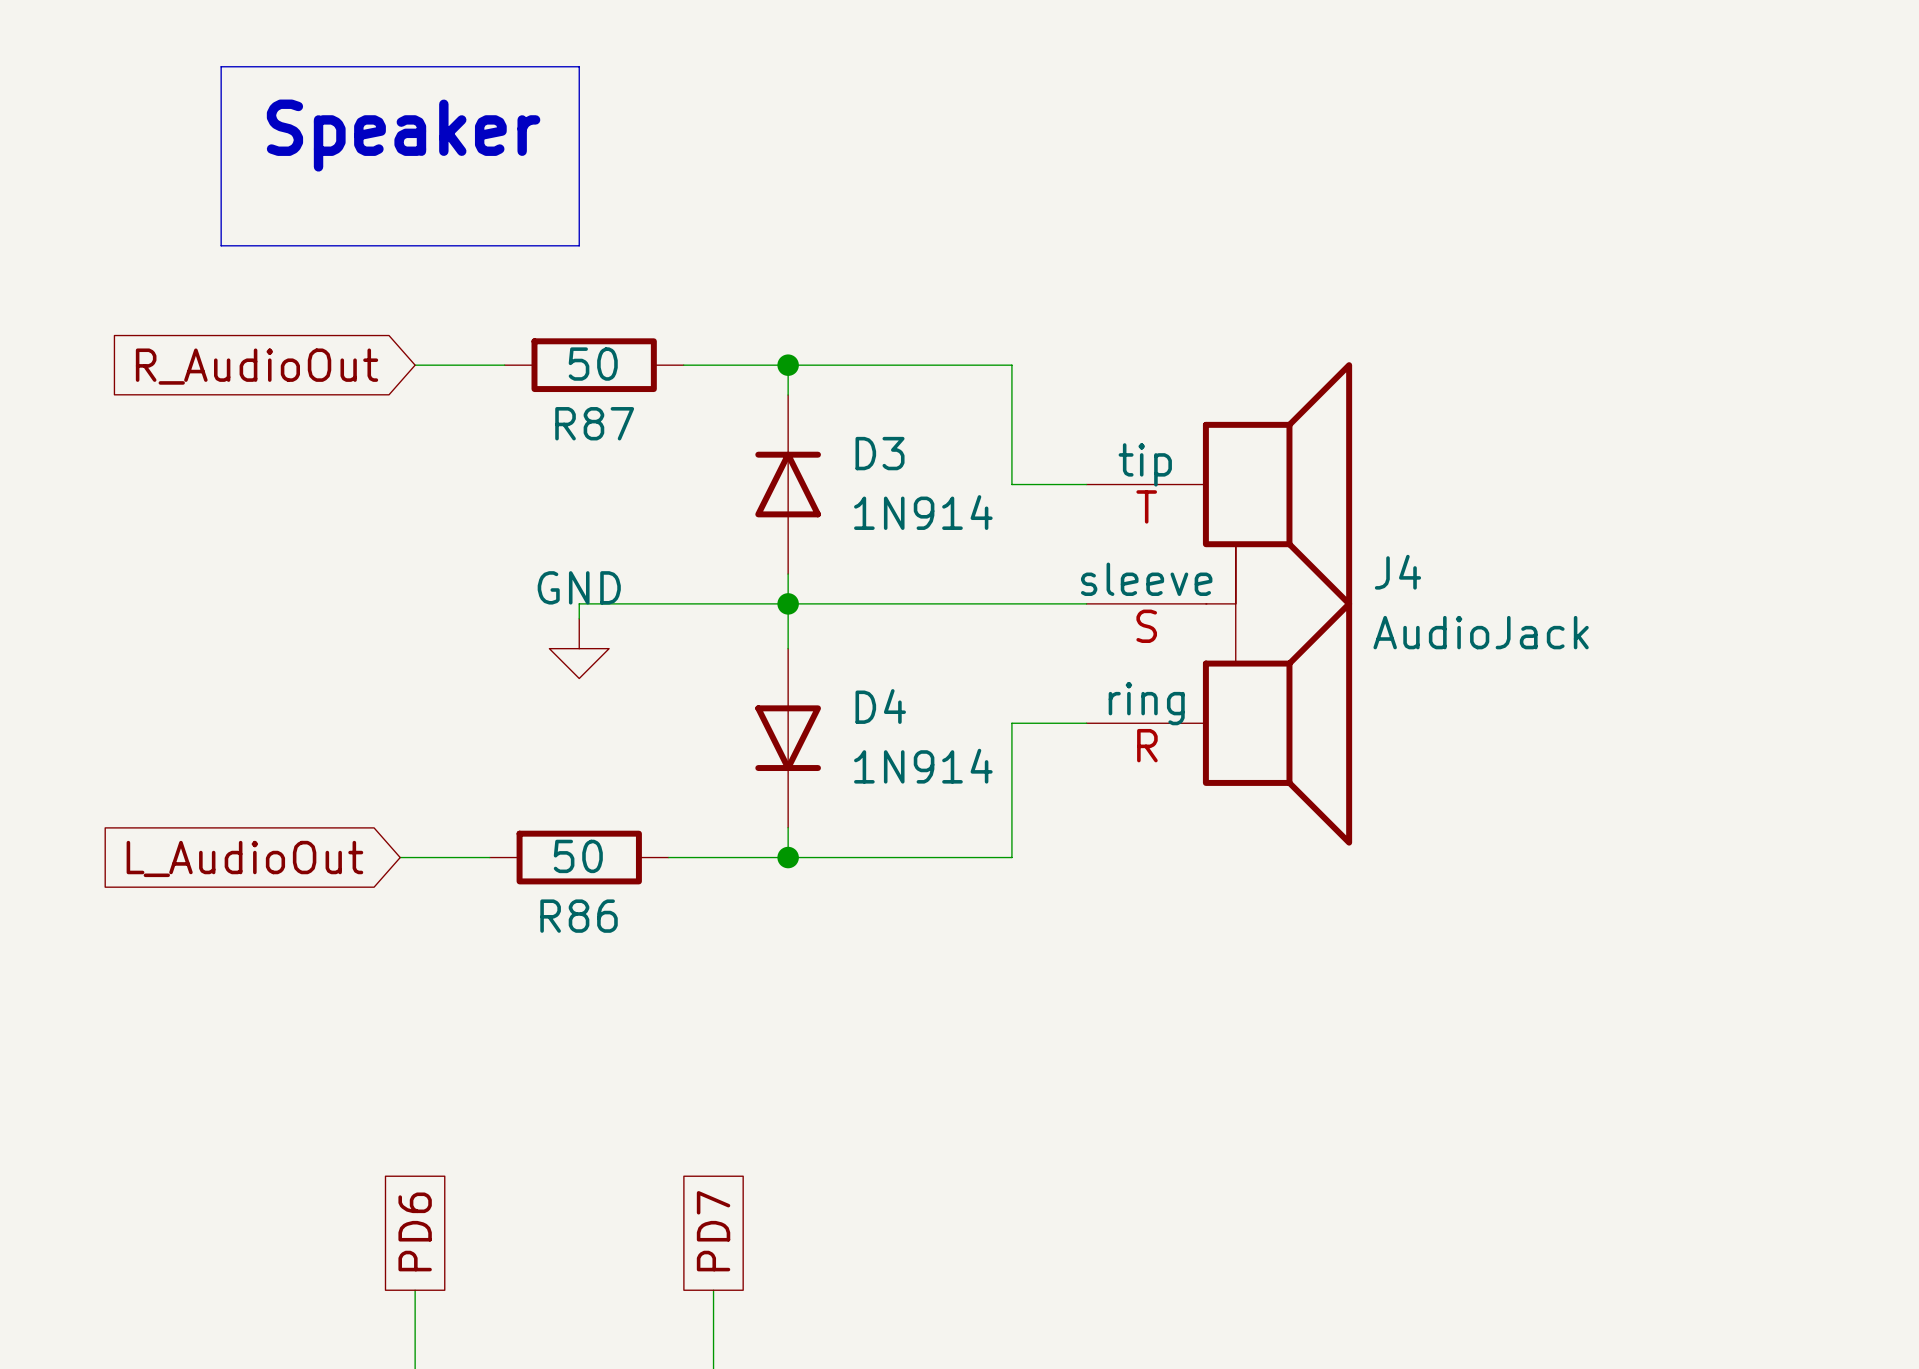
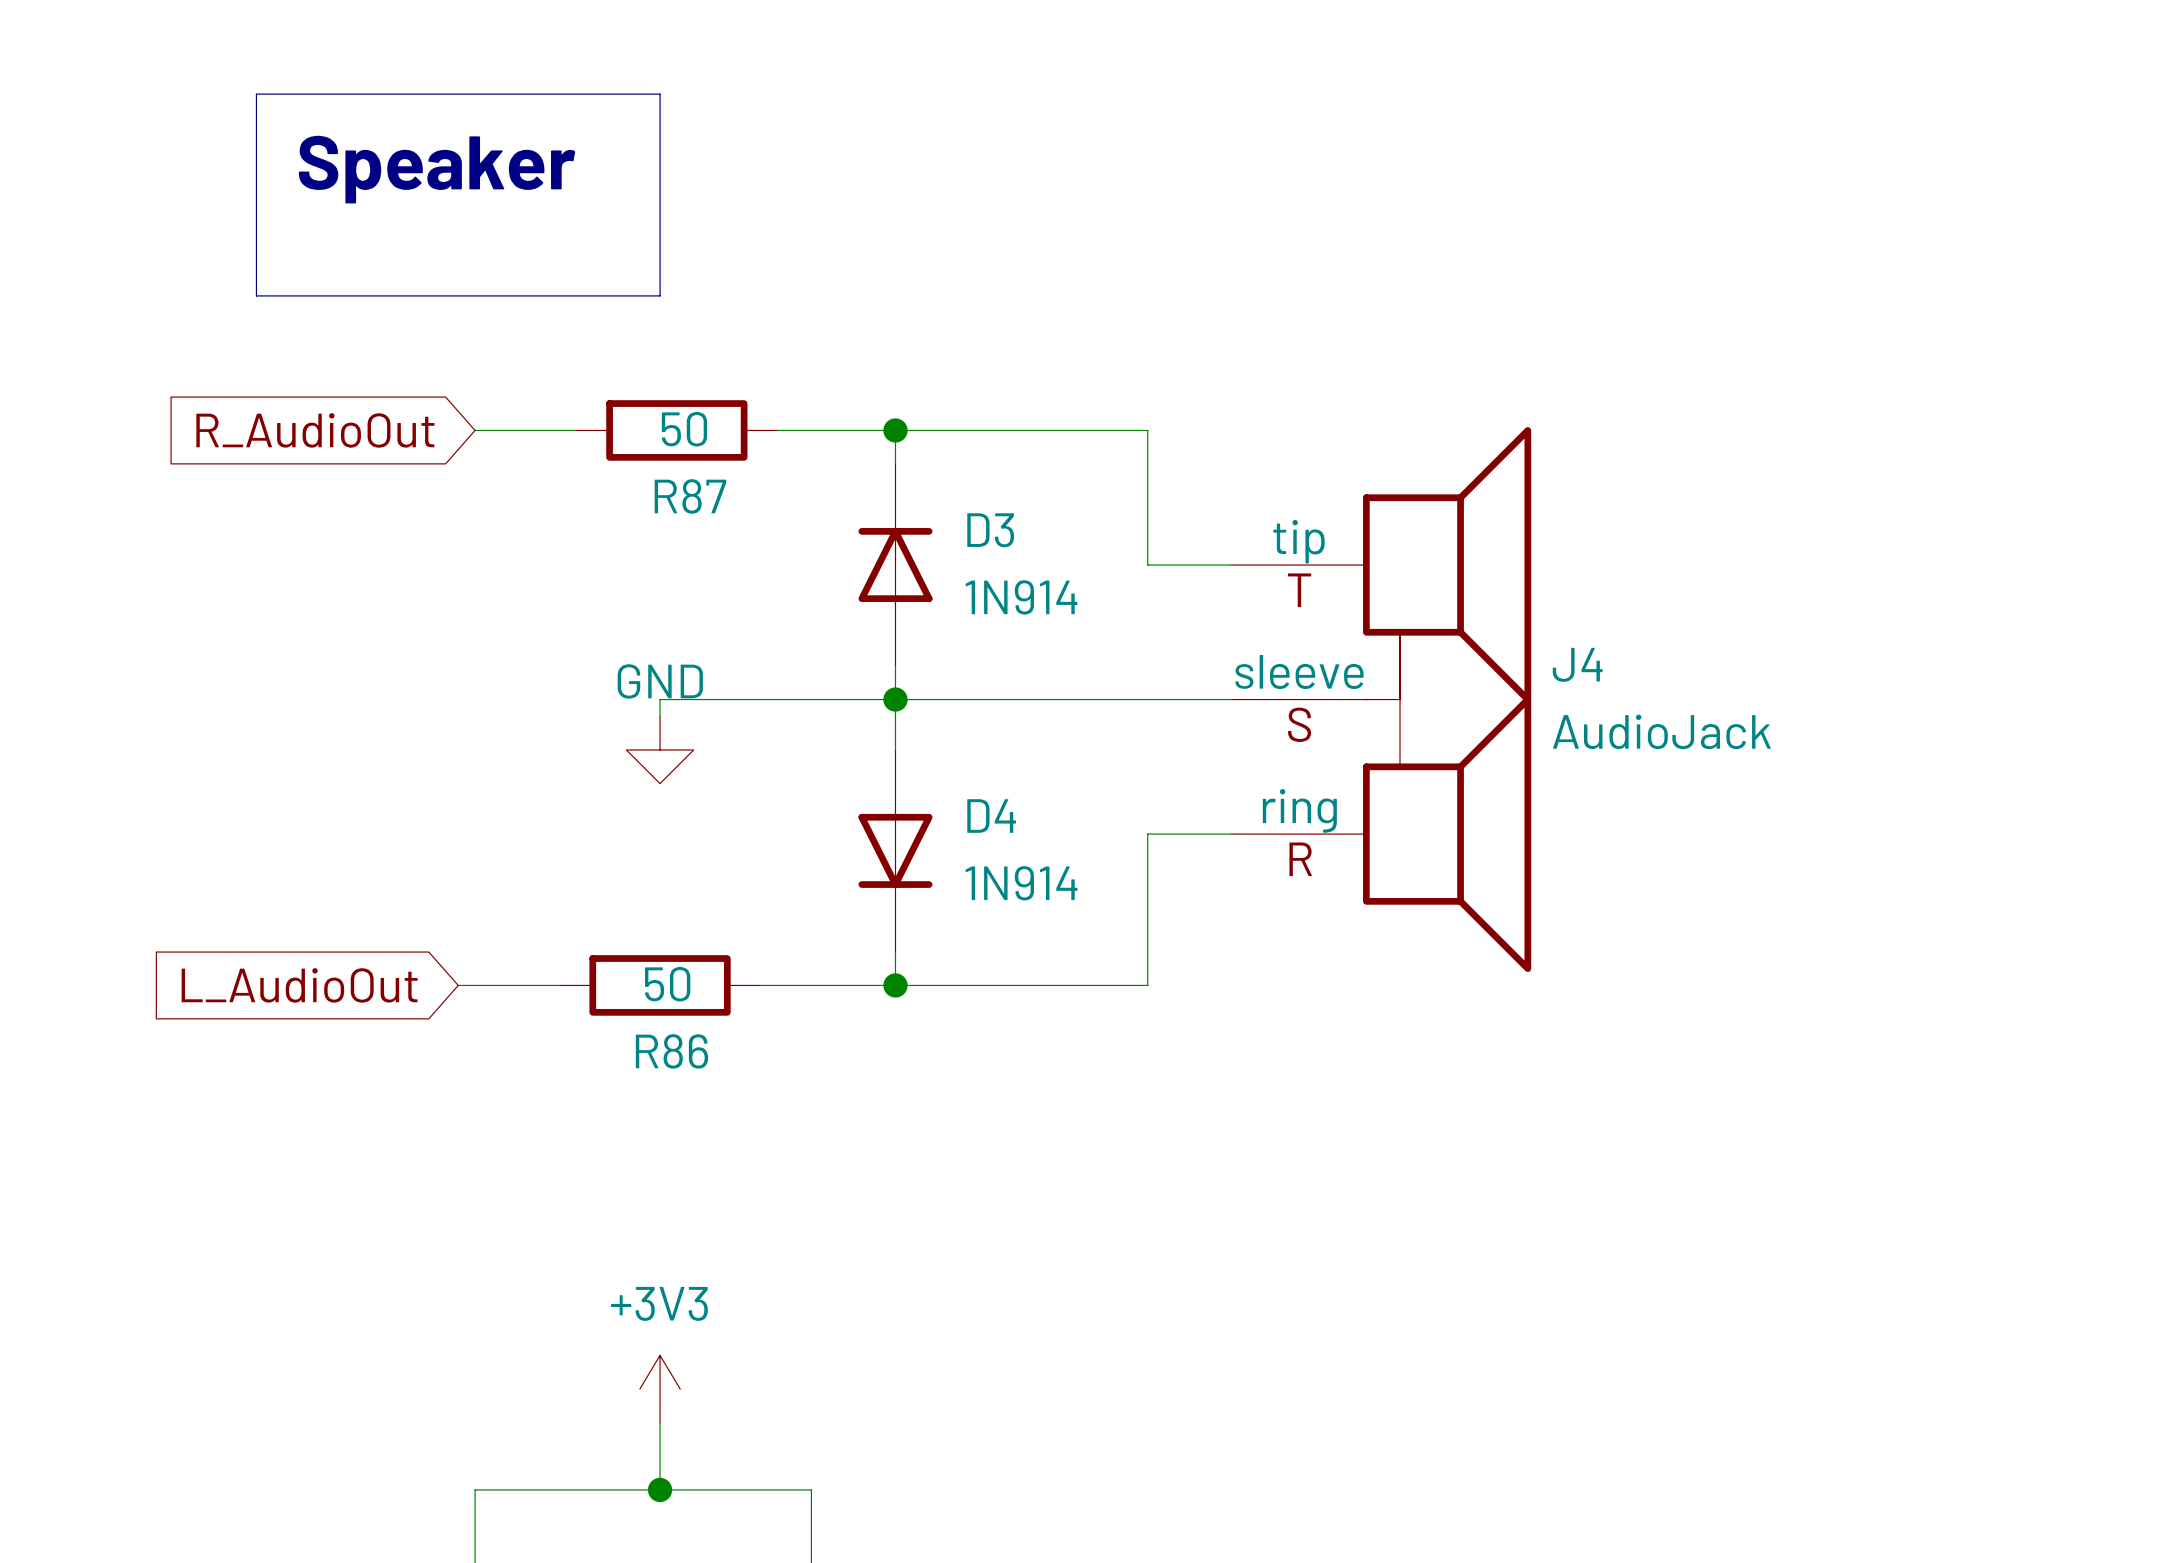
power symbol: none -> +3V3 (660, 1389)
global label: PD6 (415, 1231) -> none
global label: PD7 (713, 1231) -> none
wire: none -> (660, 1422) (660, 1489)
wire: (415, 1290) (415, 1305) -> (811, 1489) (475, 1489)
wire: (713, 1290) (713, 1305) -> none
junction: none -> (660, 1489)

